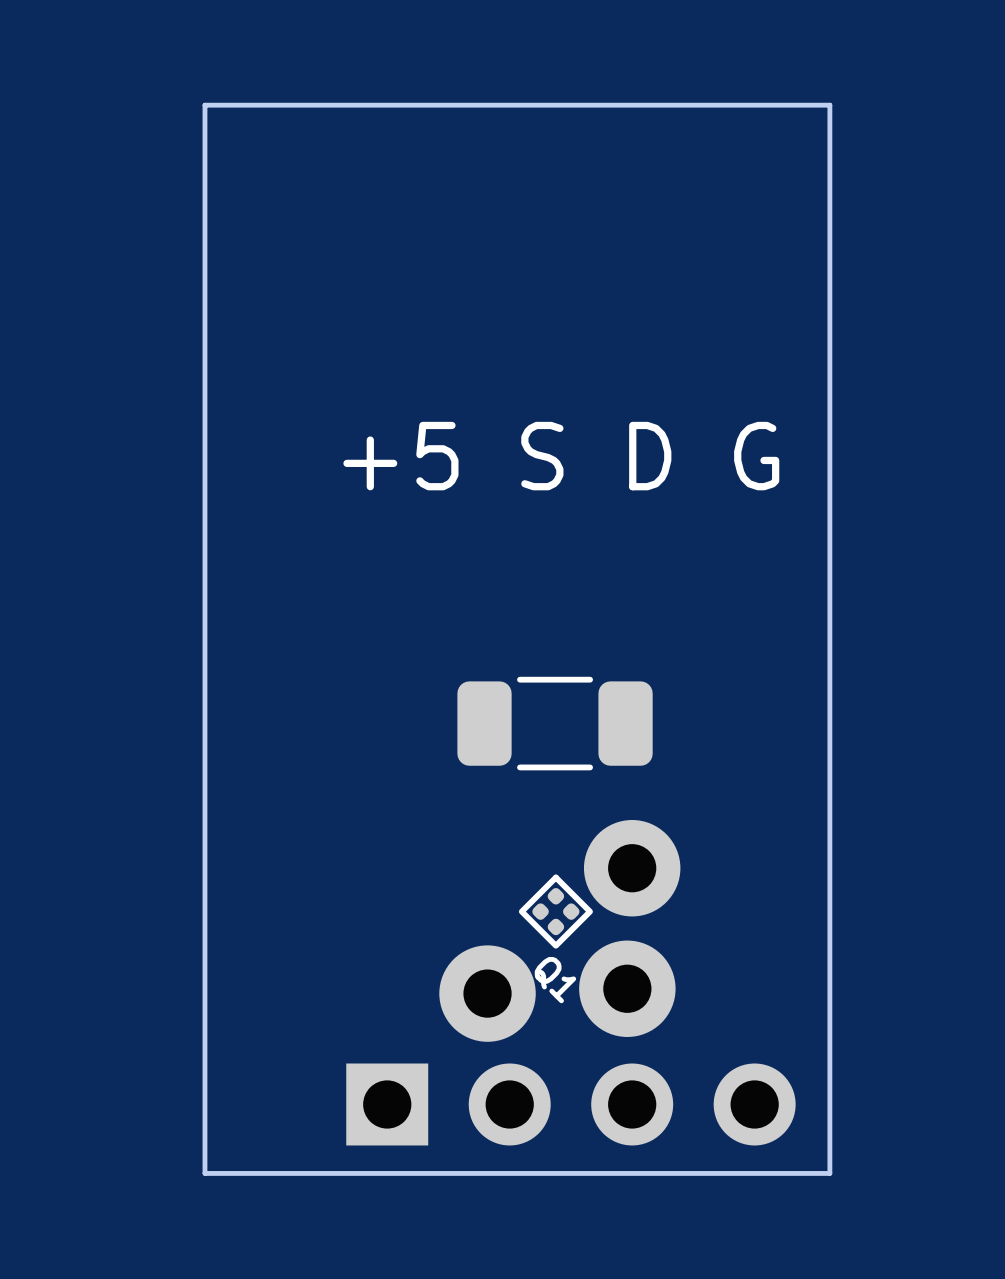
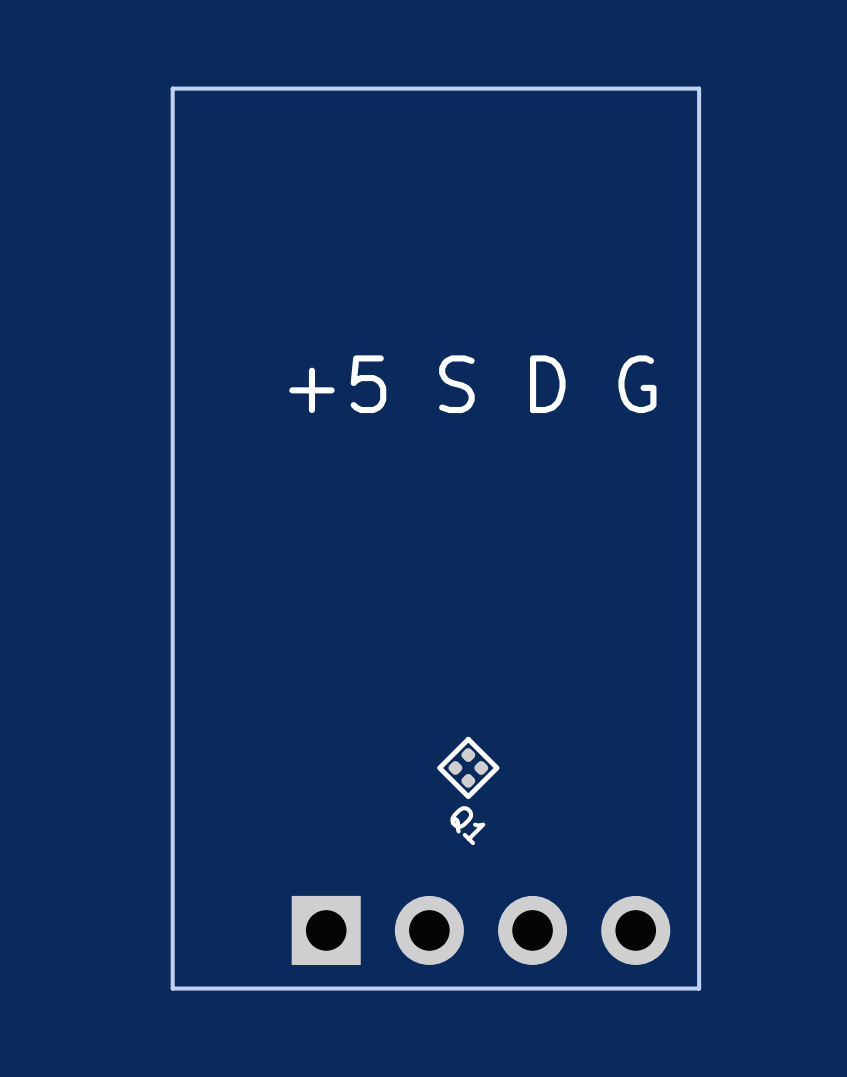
part: (555, 723) -> none
part: (632, 868) -> none
part: (627, 988) -> none
part: (487, 993) -> none

